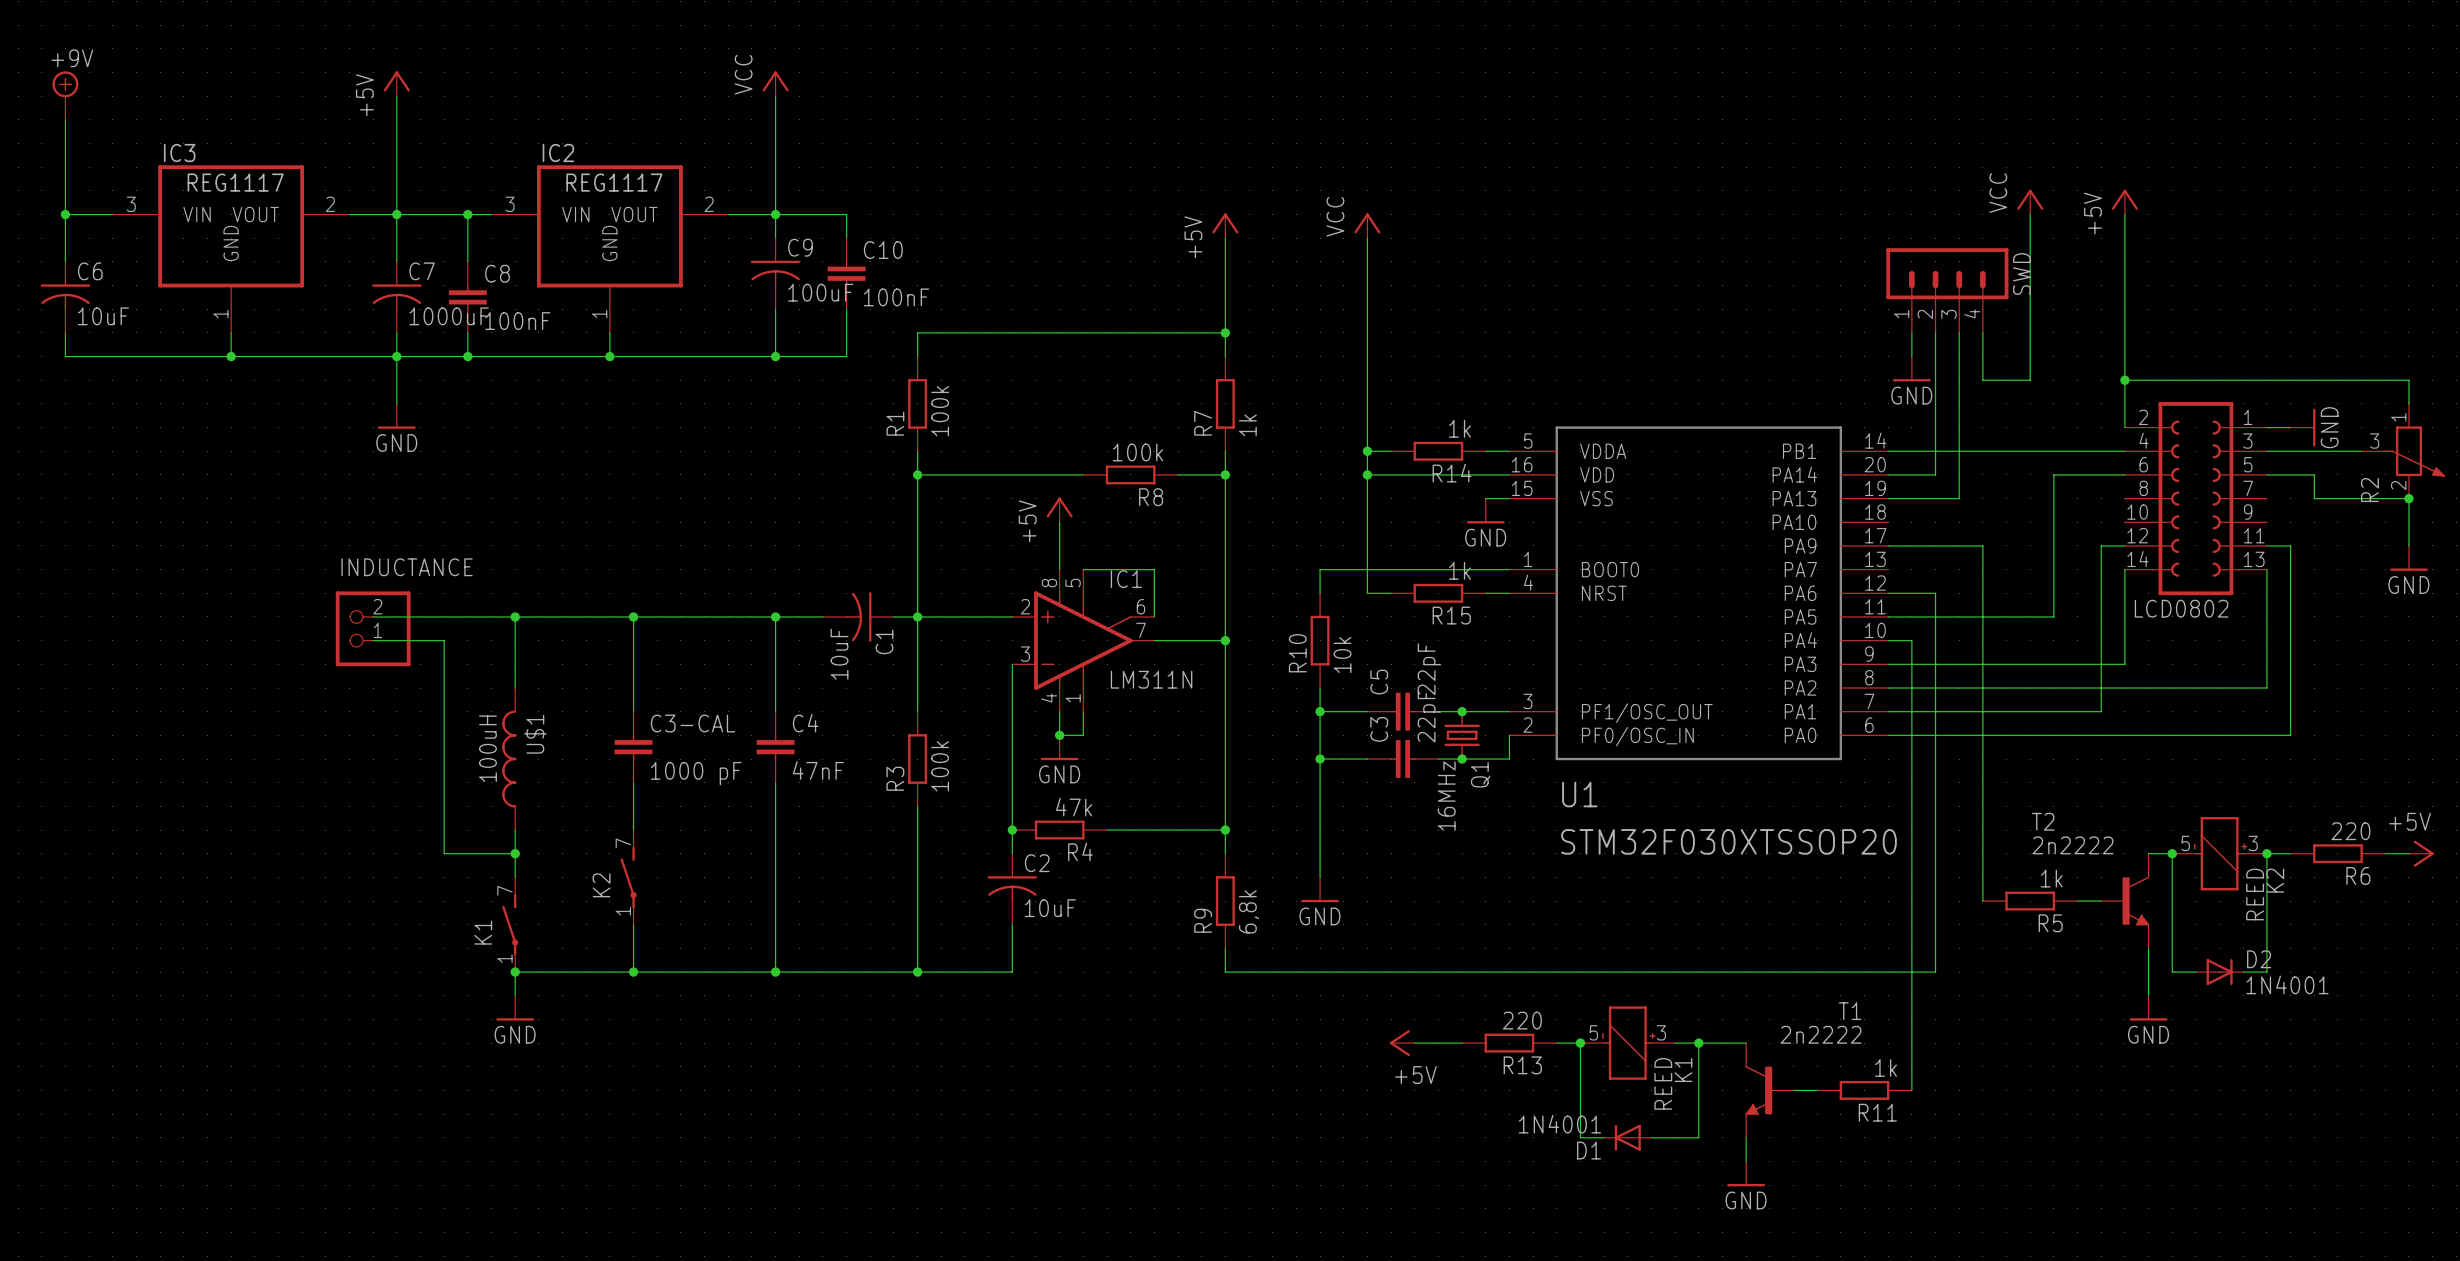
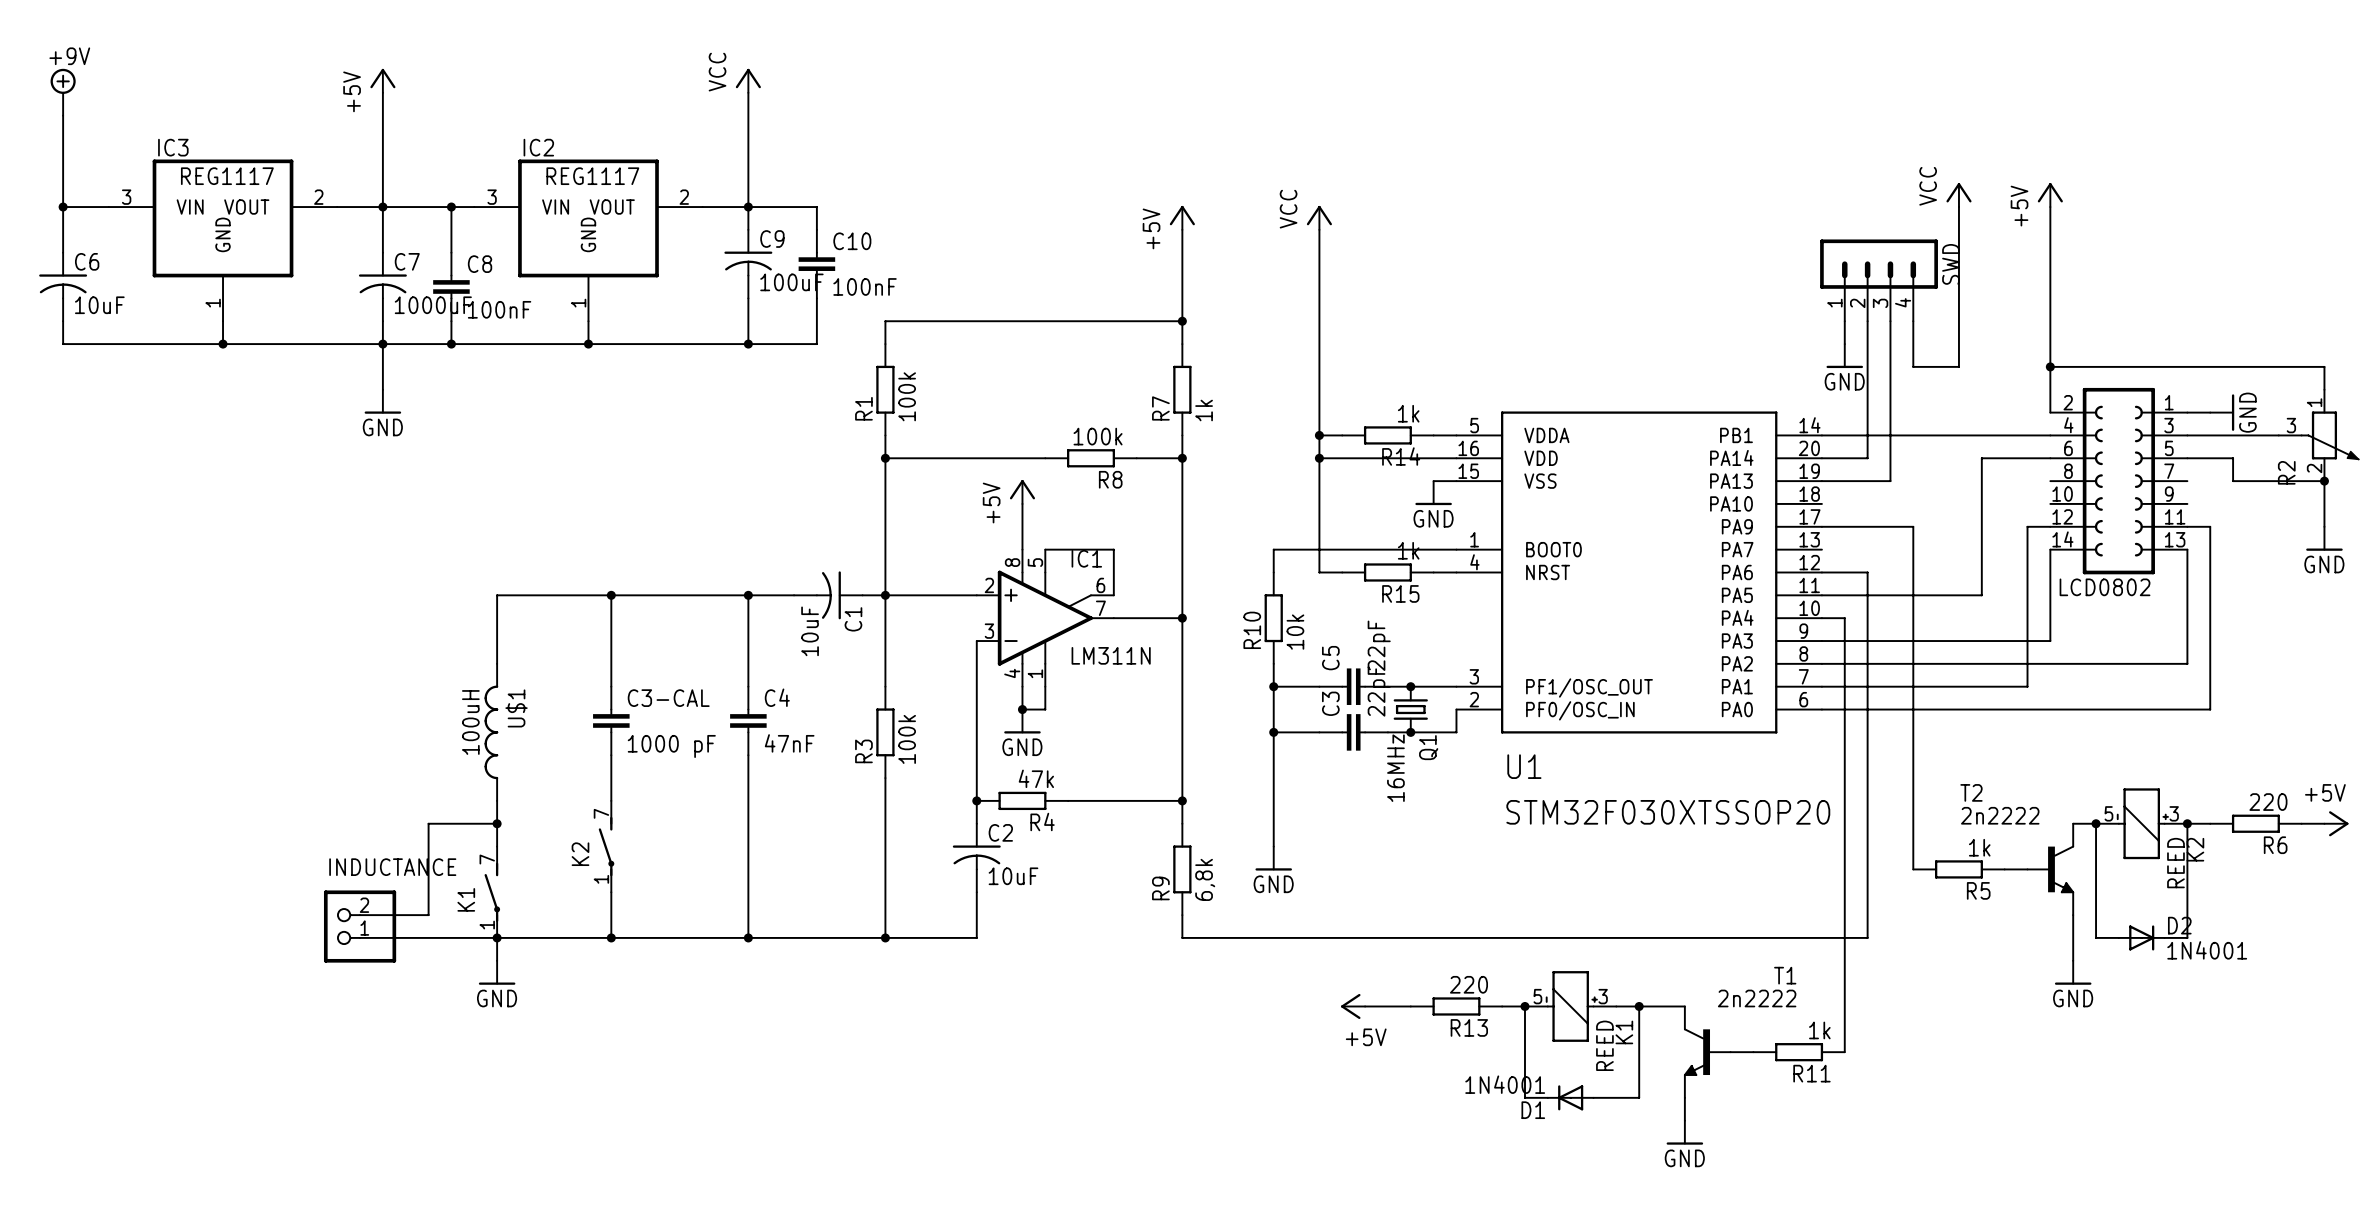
wire: (373, 616) (515, 616) -> none
junction: (515, 616) -> none
INDUCTANCE: (373, 628) -> none
wire: (373, 640) (444, 640) (444, 853) -> (360, 915) (428, 915) (428, 823)
INDUCTANCE: none -> (360, 926)
wire: none -> (360, 937) (497, 937)

